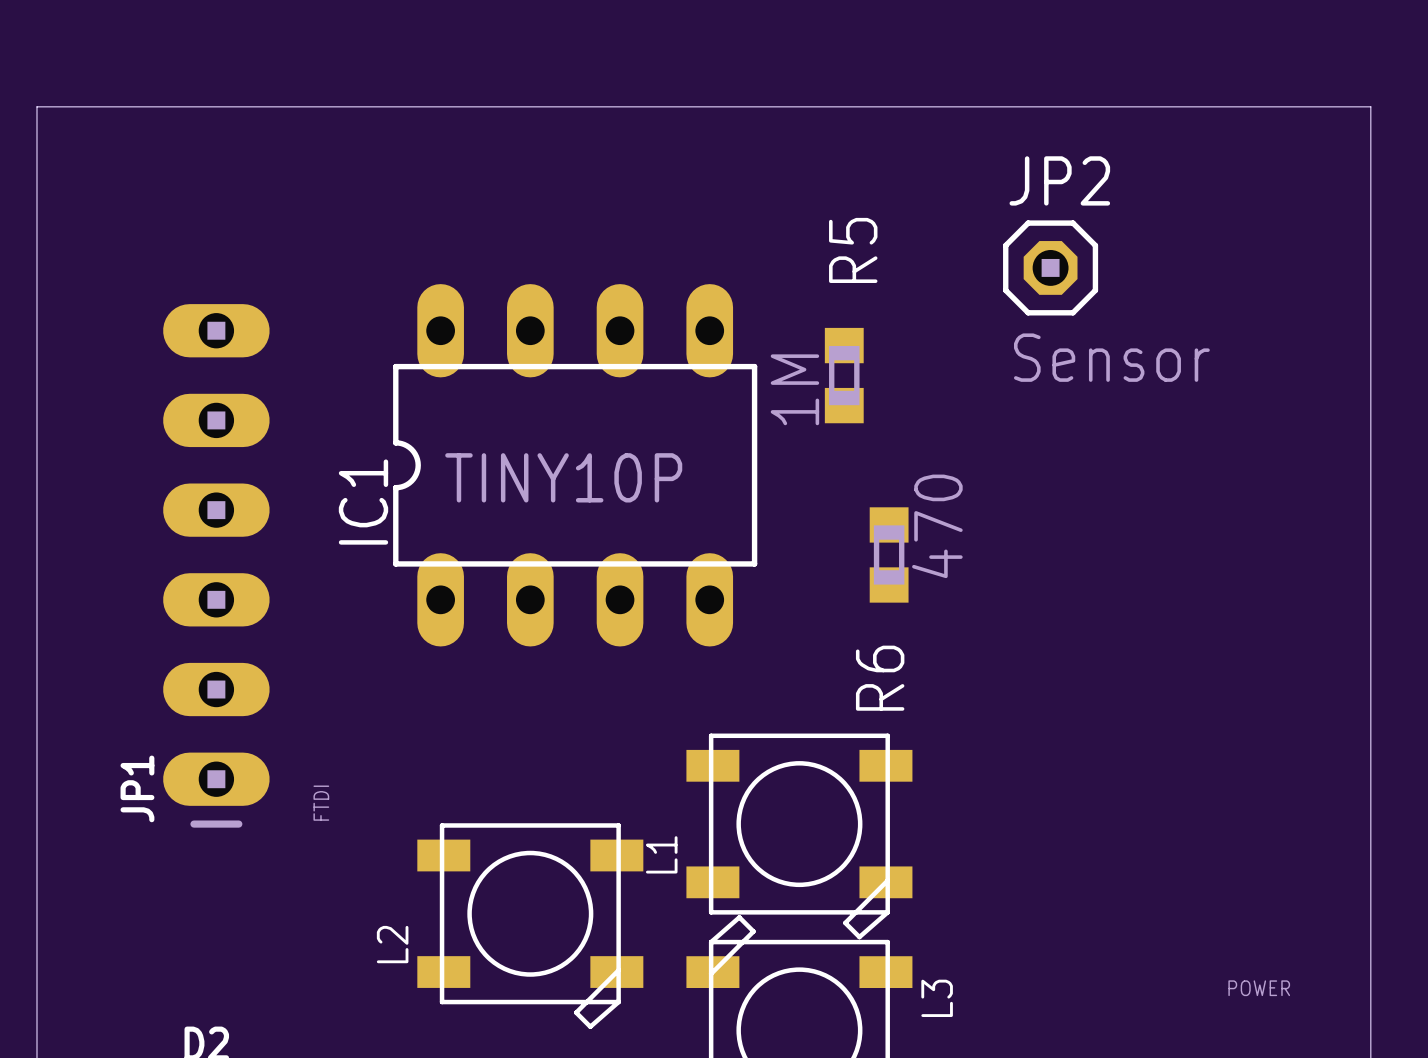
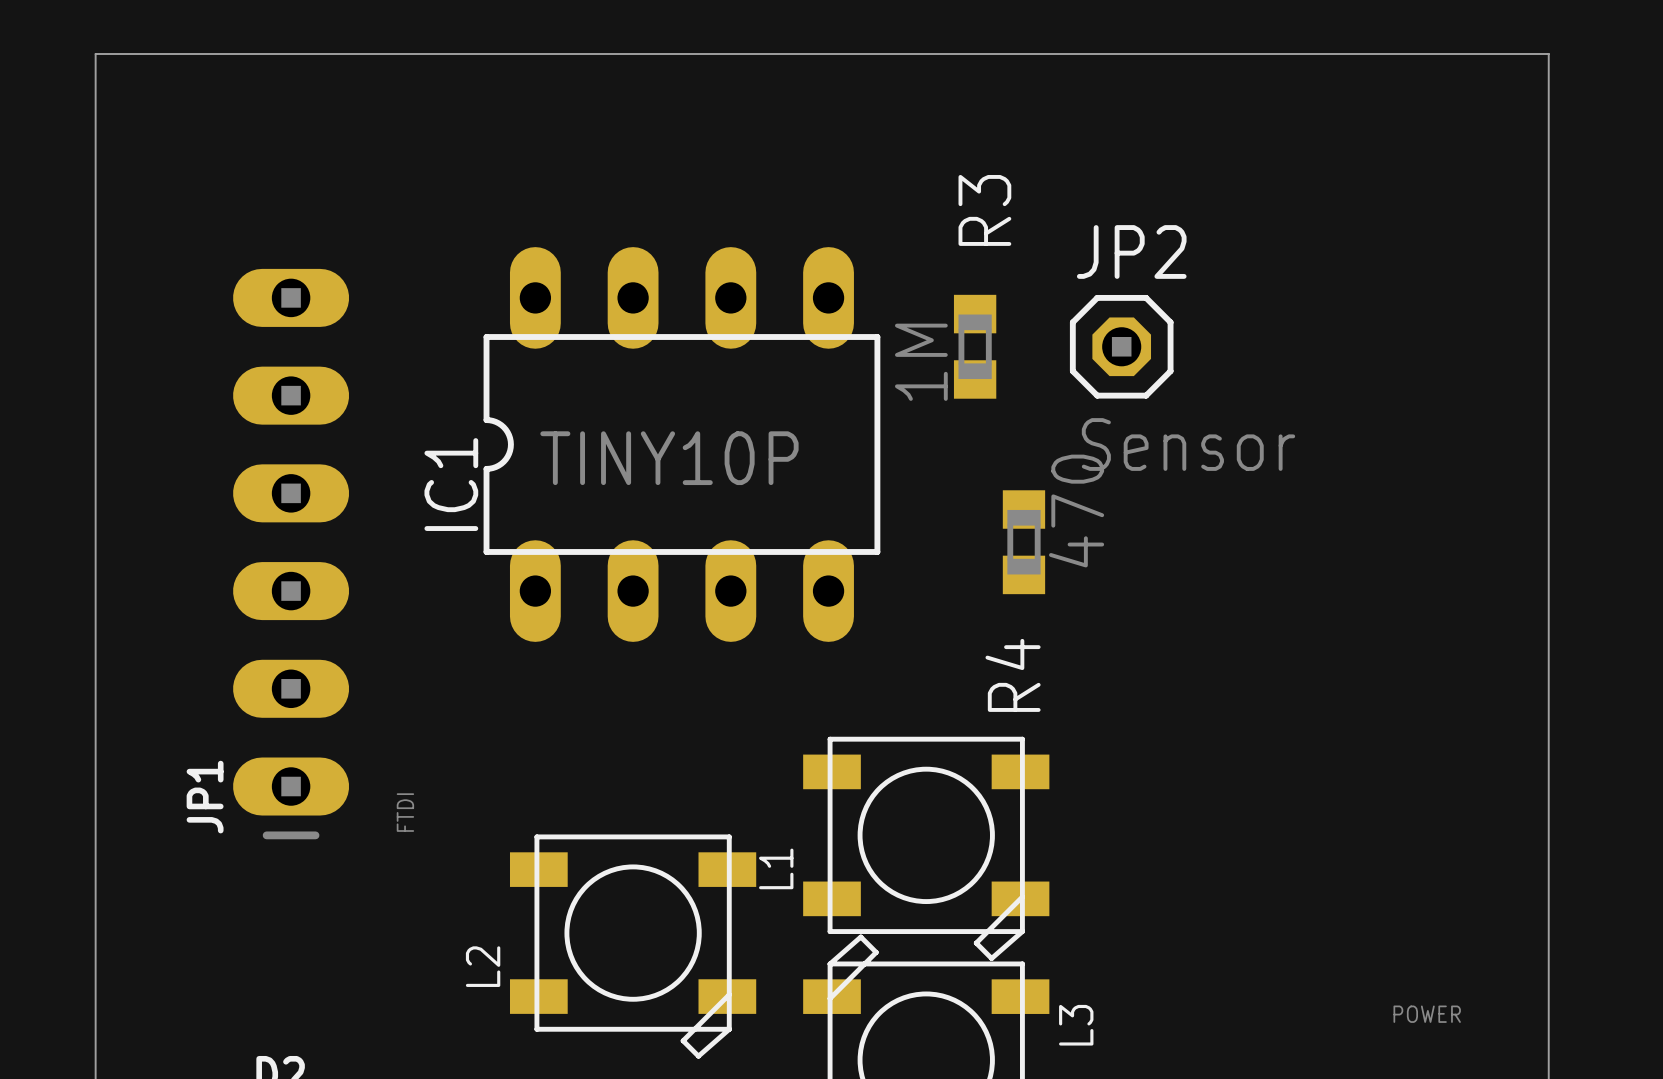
R5 name: R5 (853, 250) -> R3 (984, 210)
JP2 position: (1050, 267) -> (1121, 346)
R6 name: R6 (880, 678) -> R4 (1013, 675)

